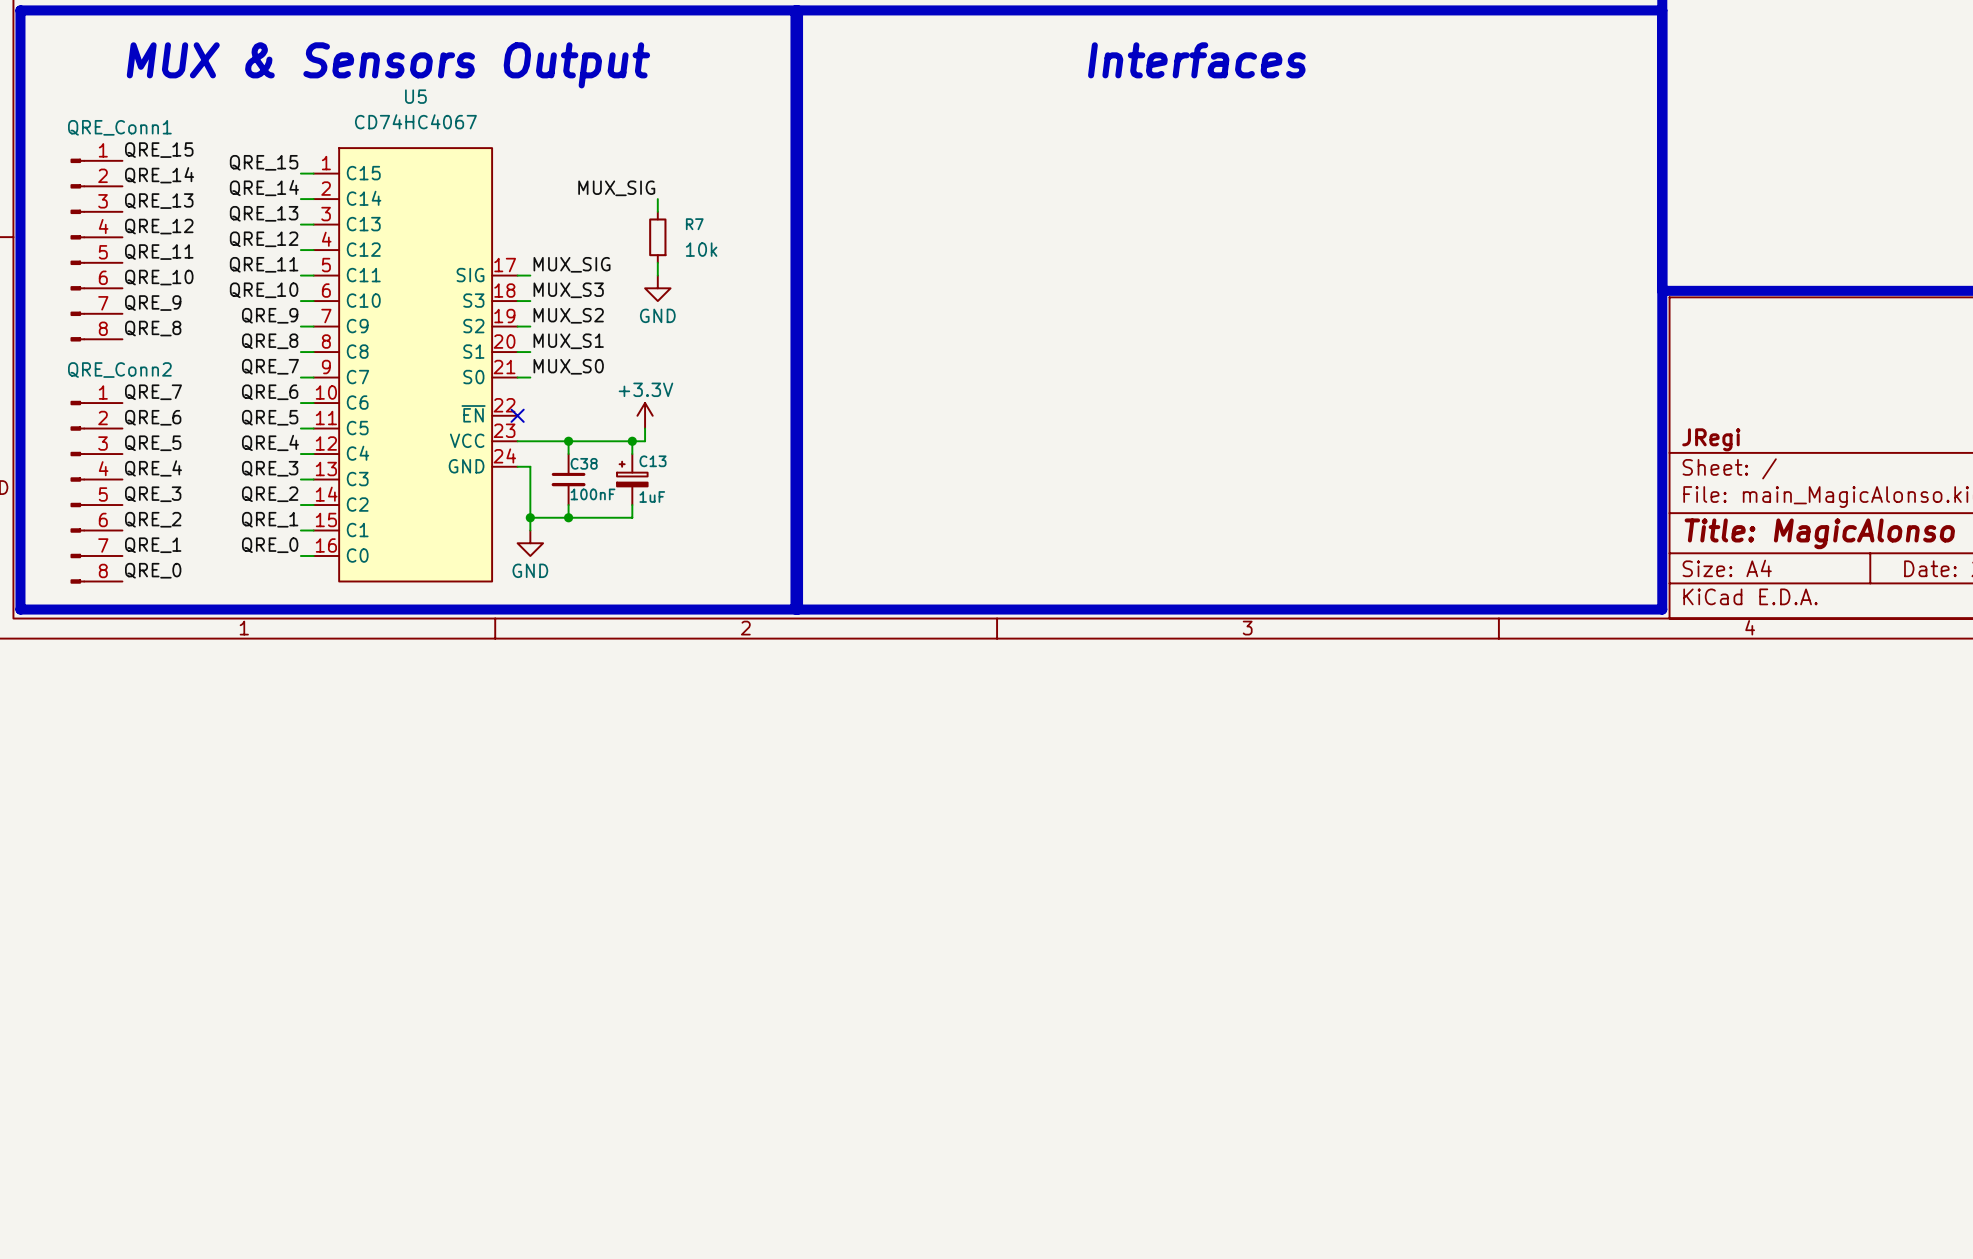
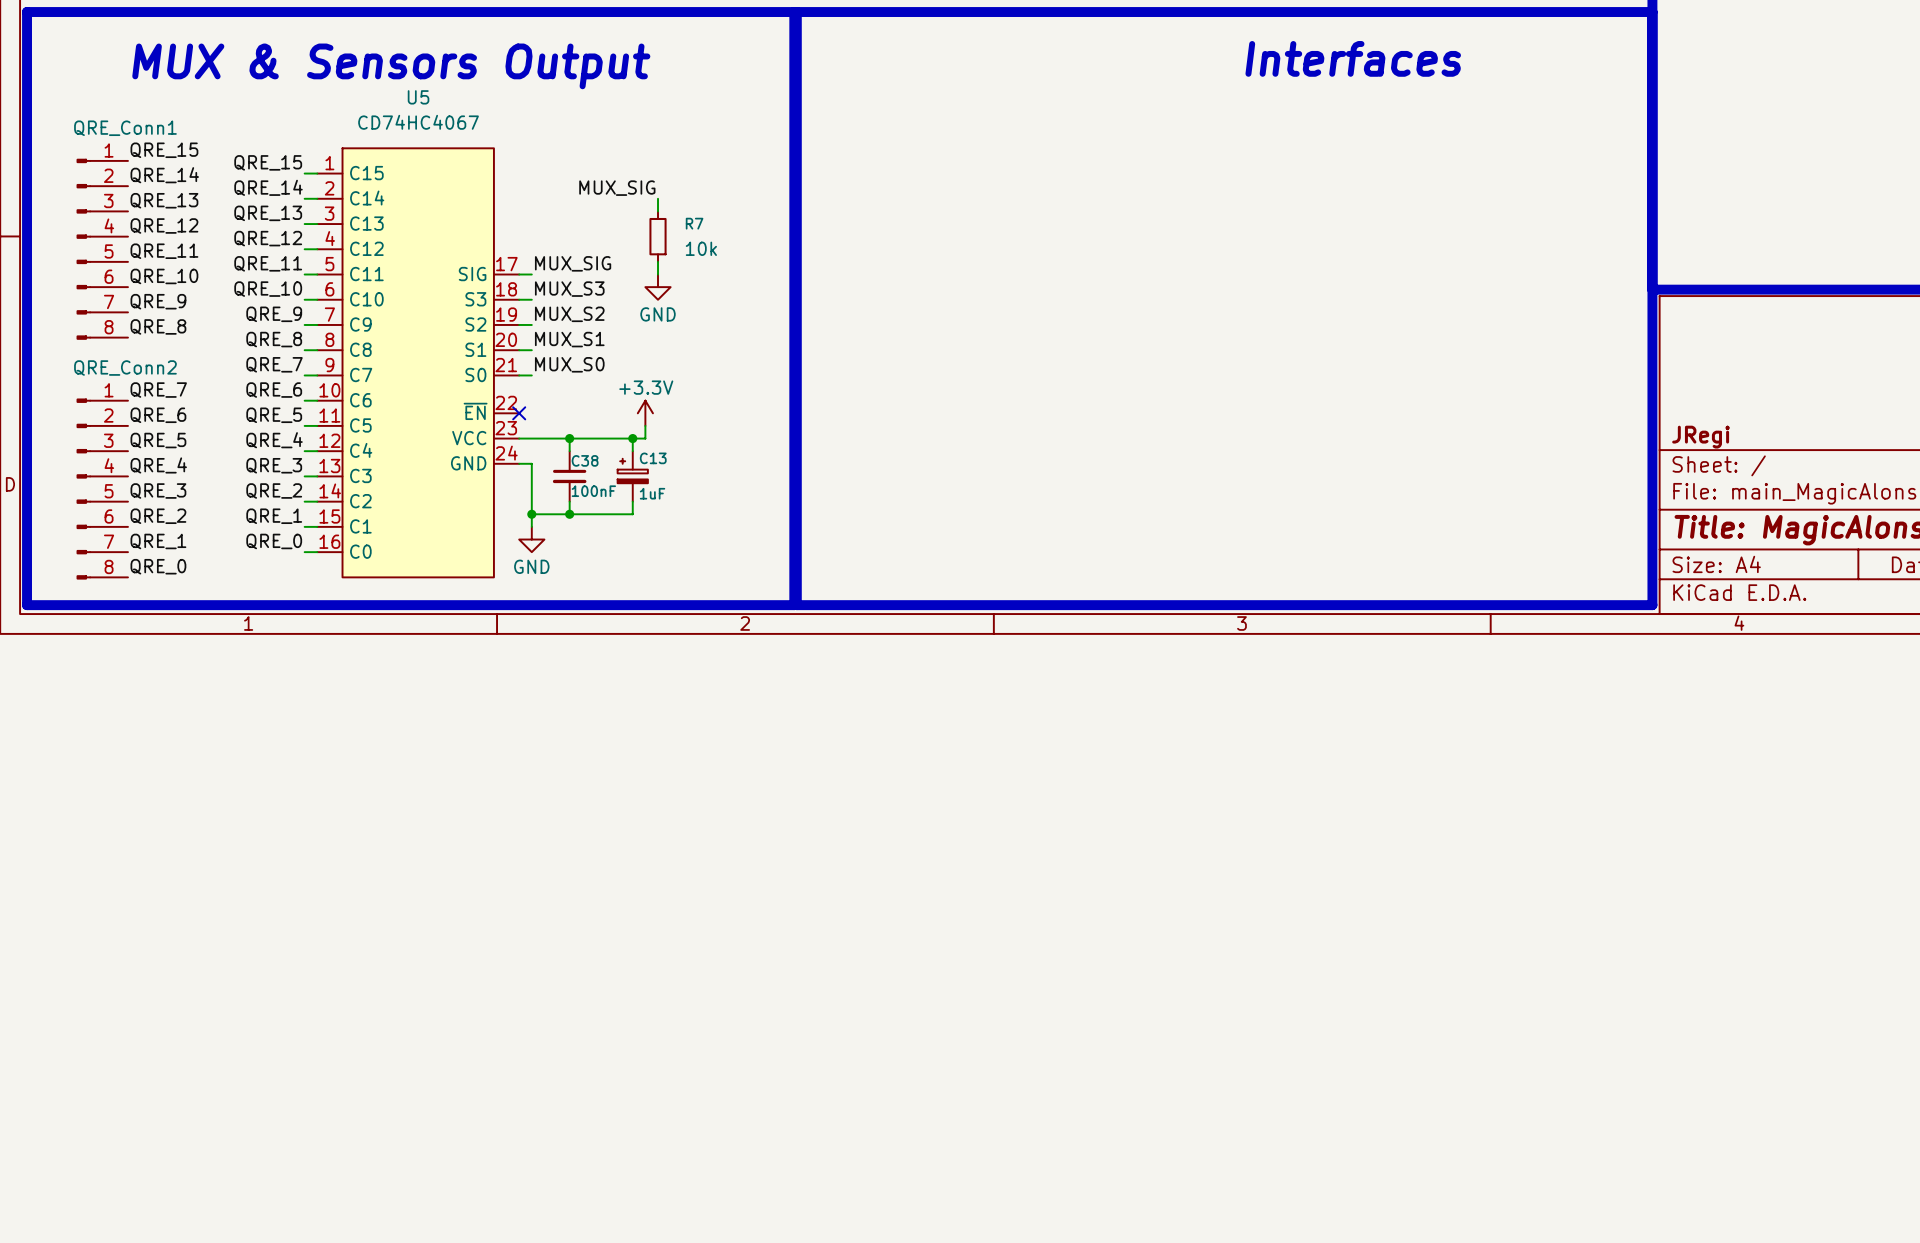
text position: Interfaces (1196, 60) -> Interfaces (1353, 58)

